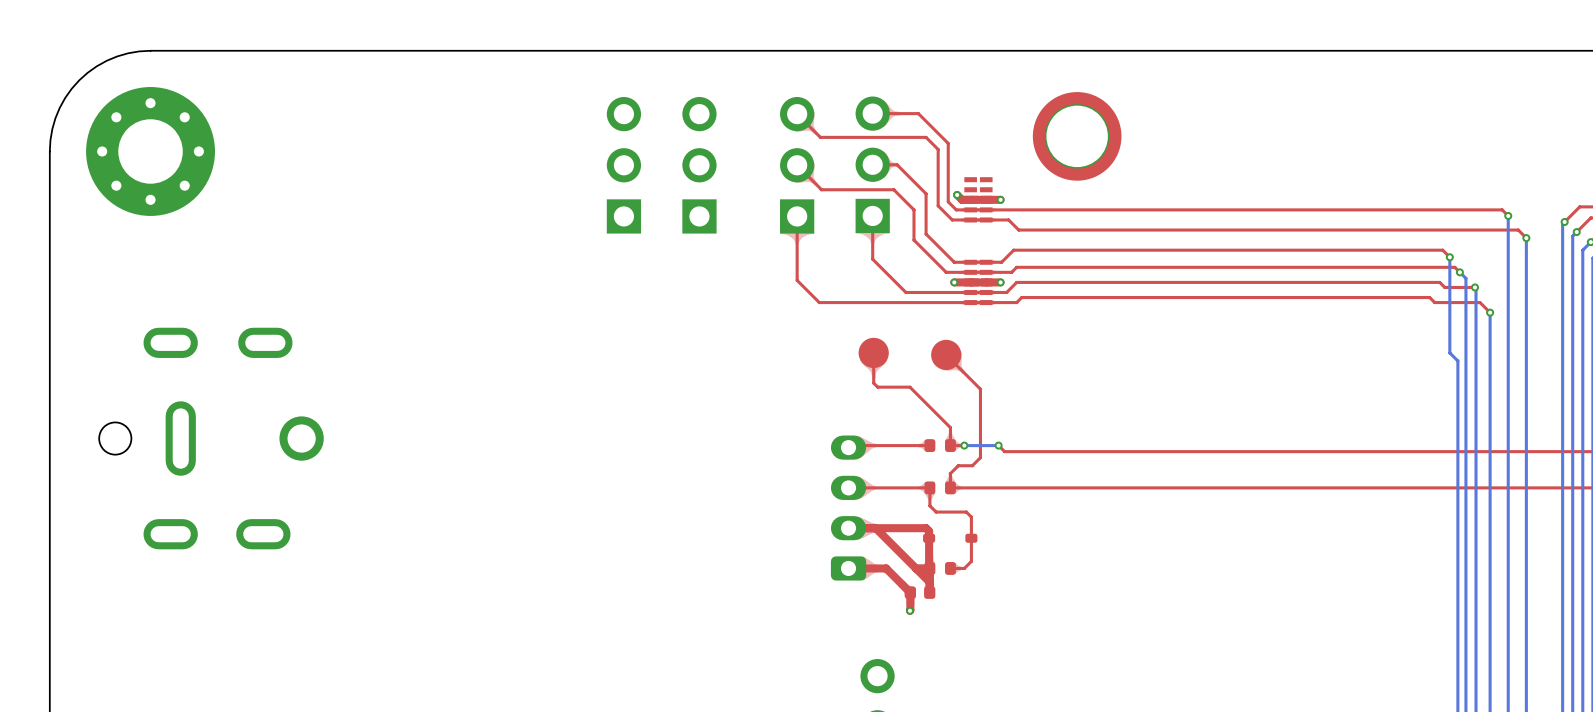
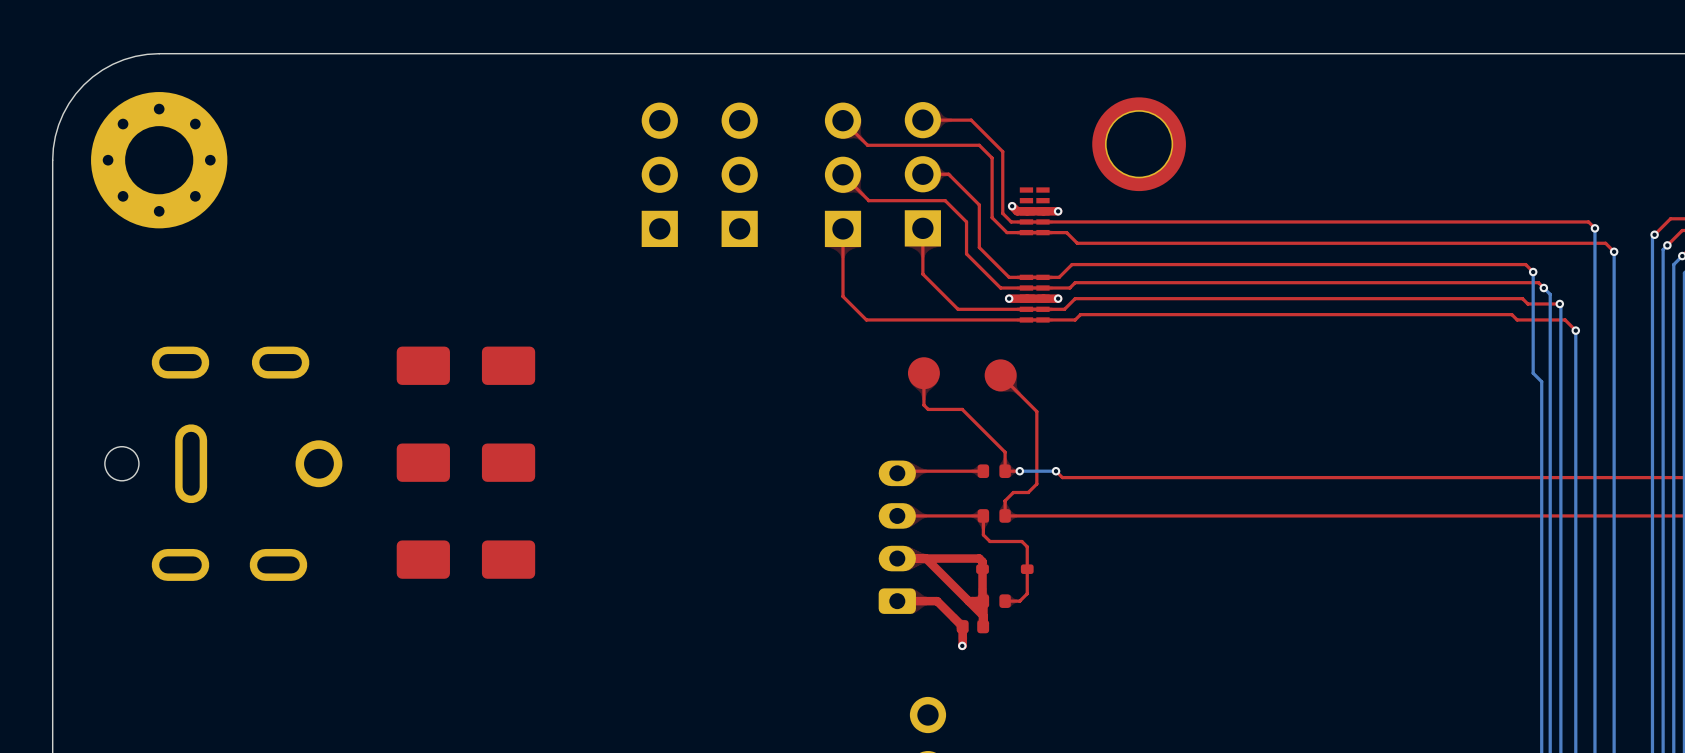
part: none -> (465, 365)
part: none -> (465, 462)
part: none -> (465, 559)

